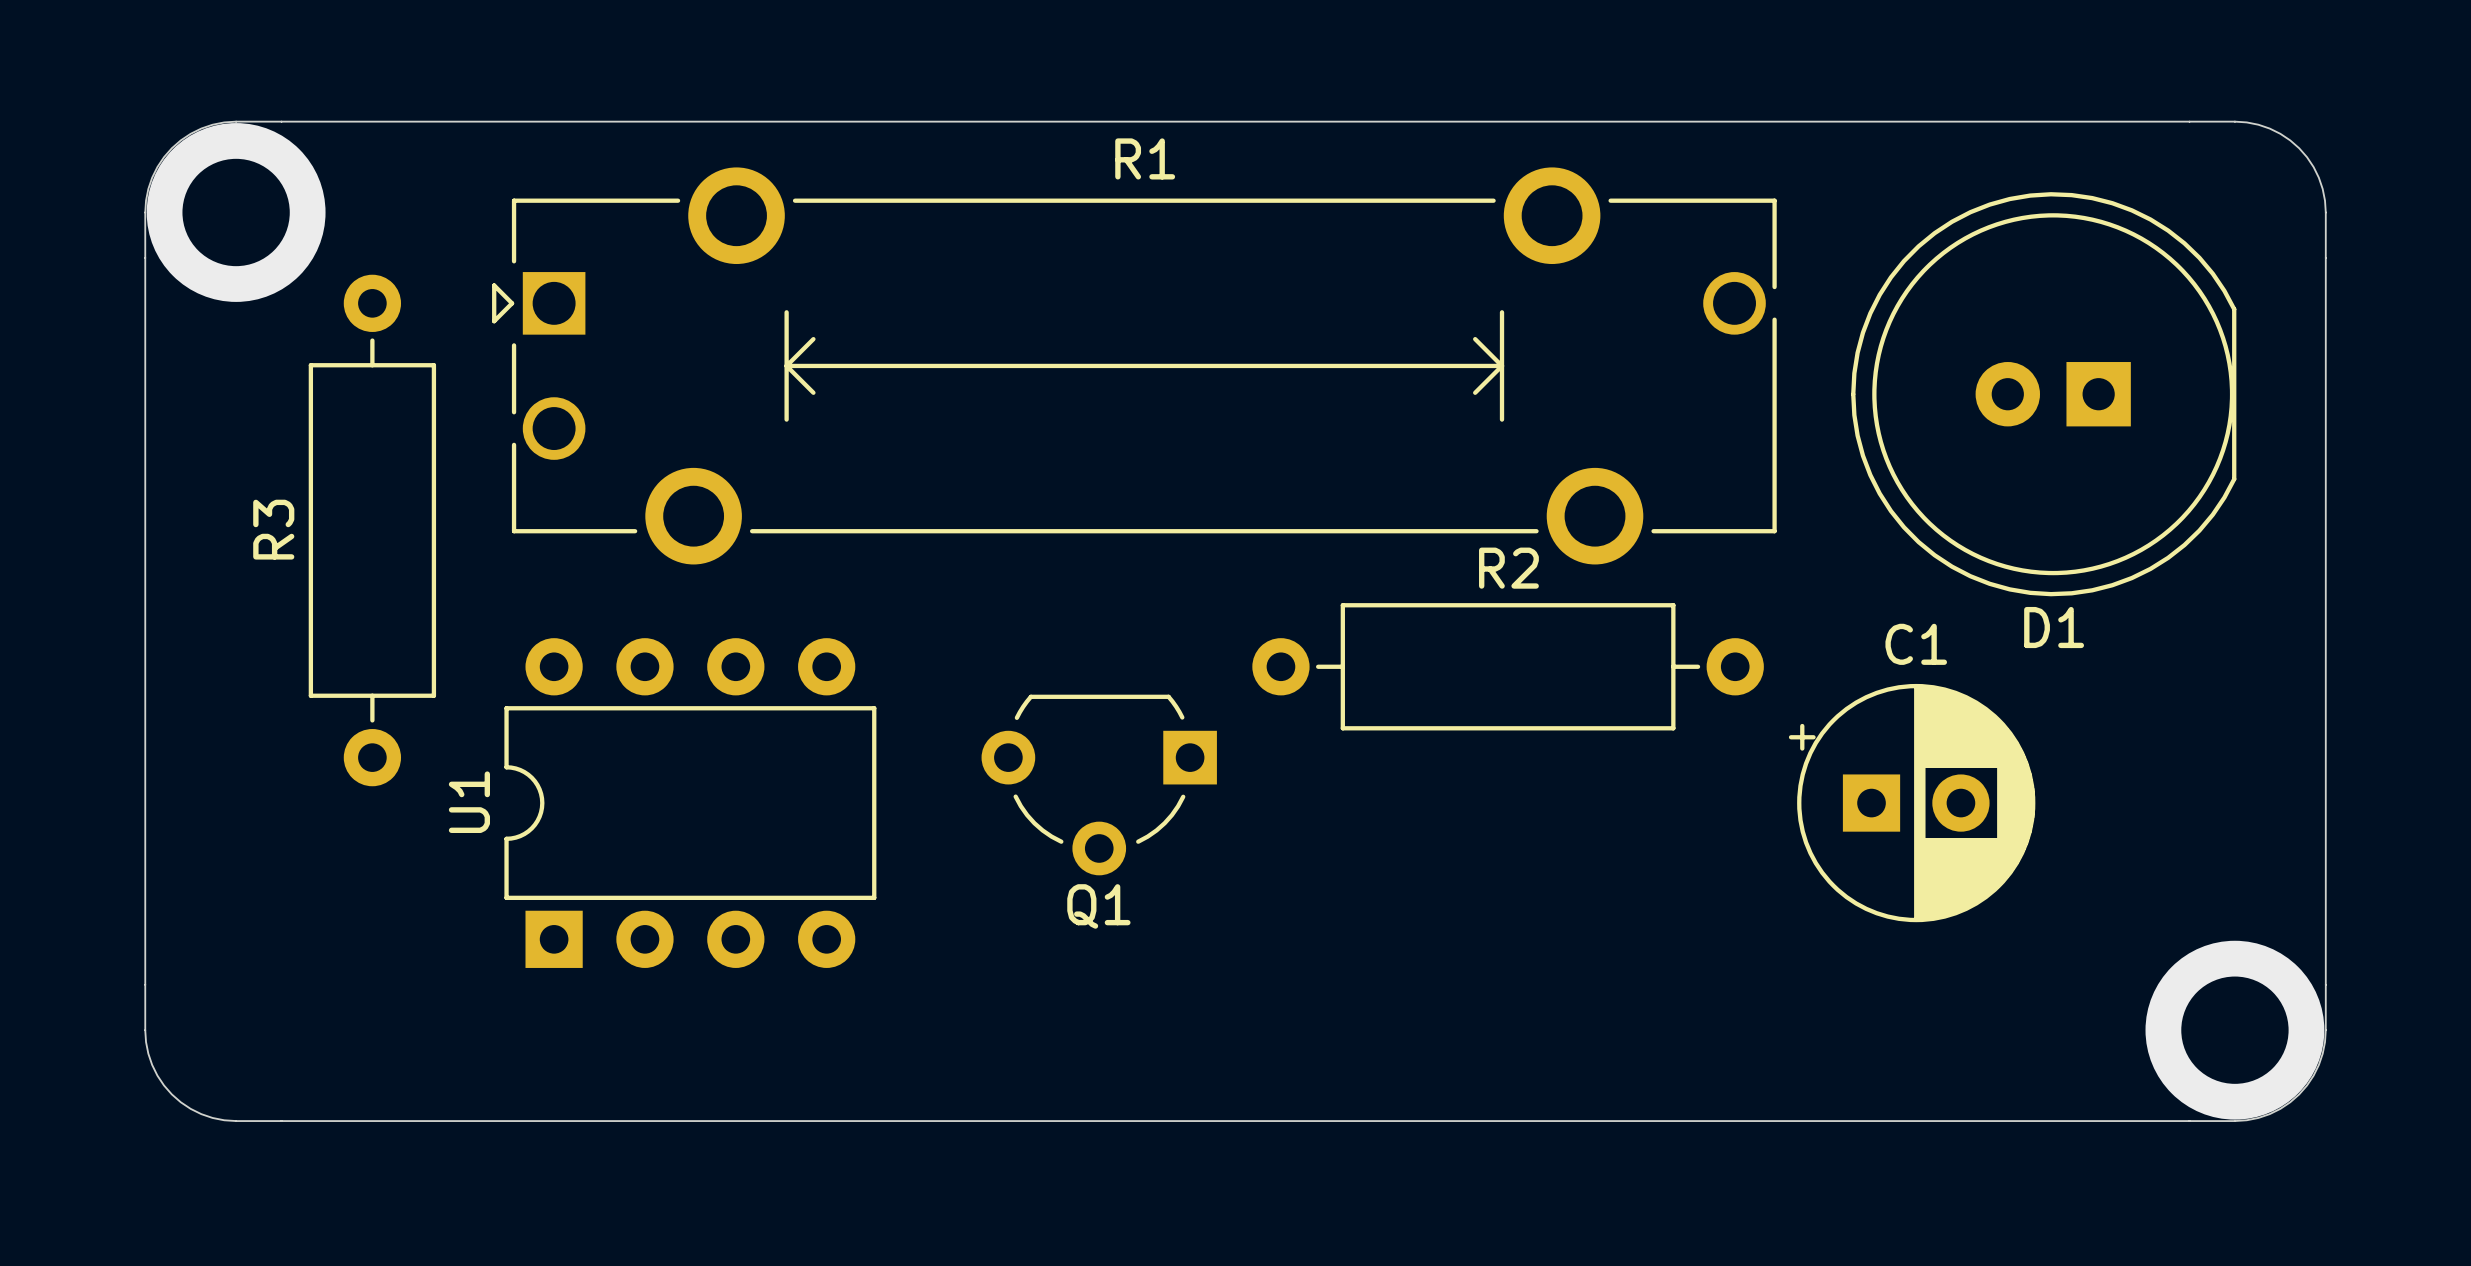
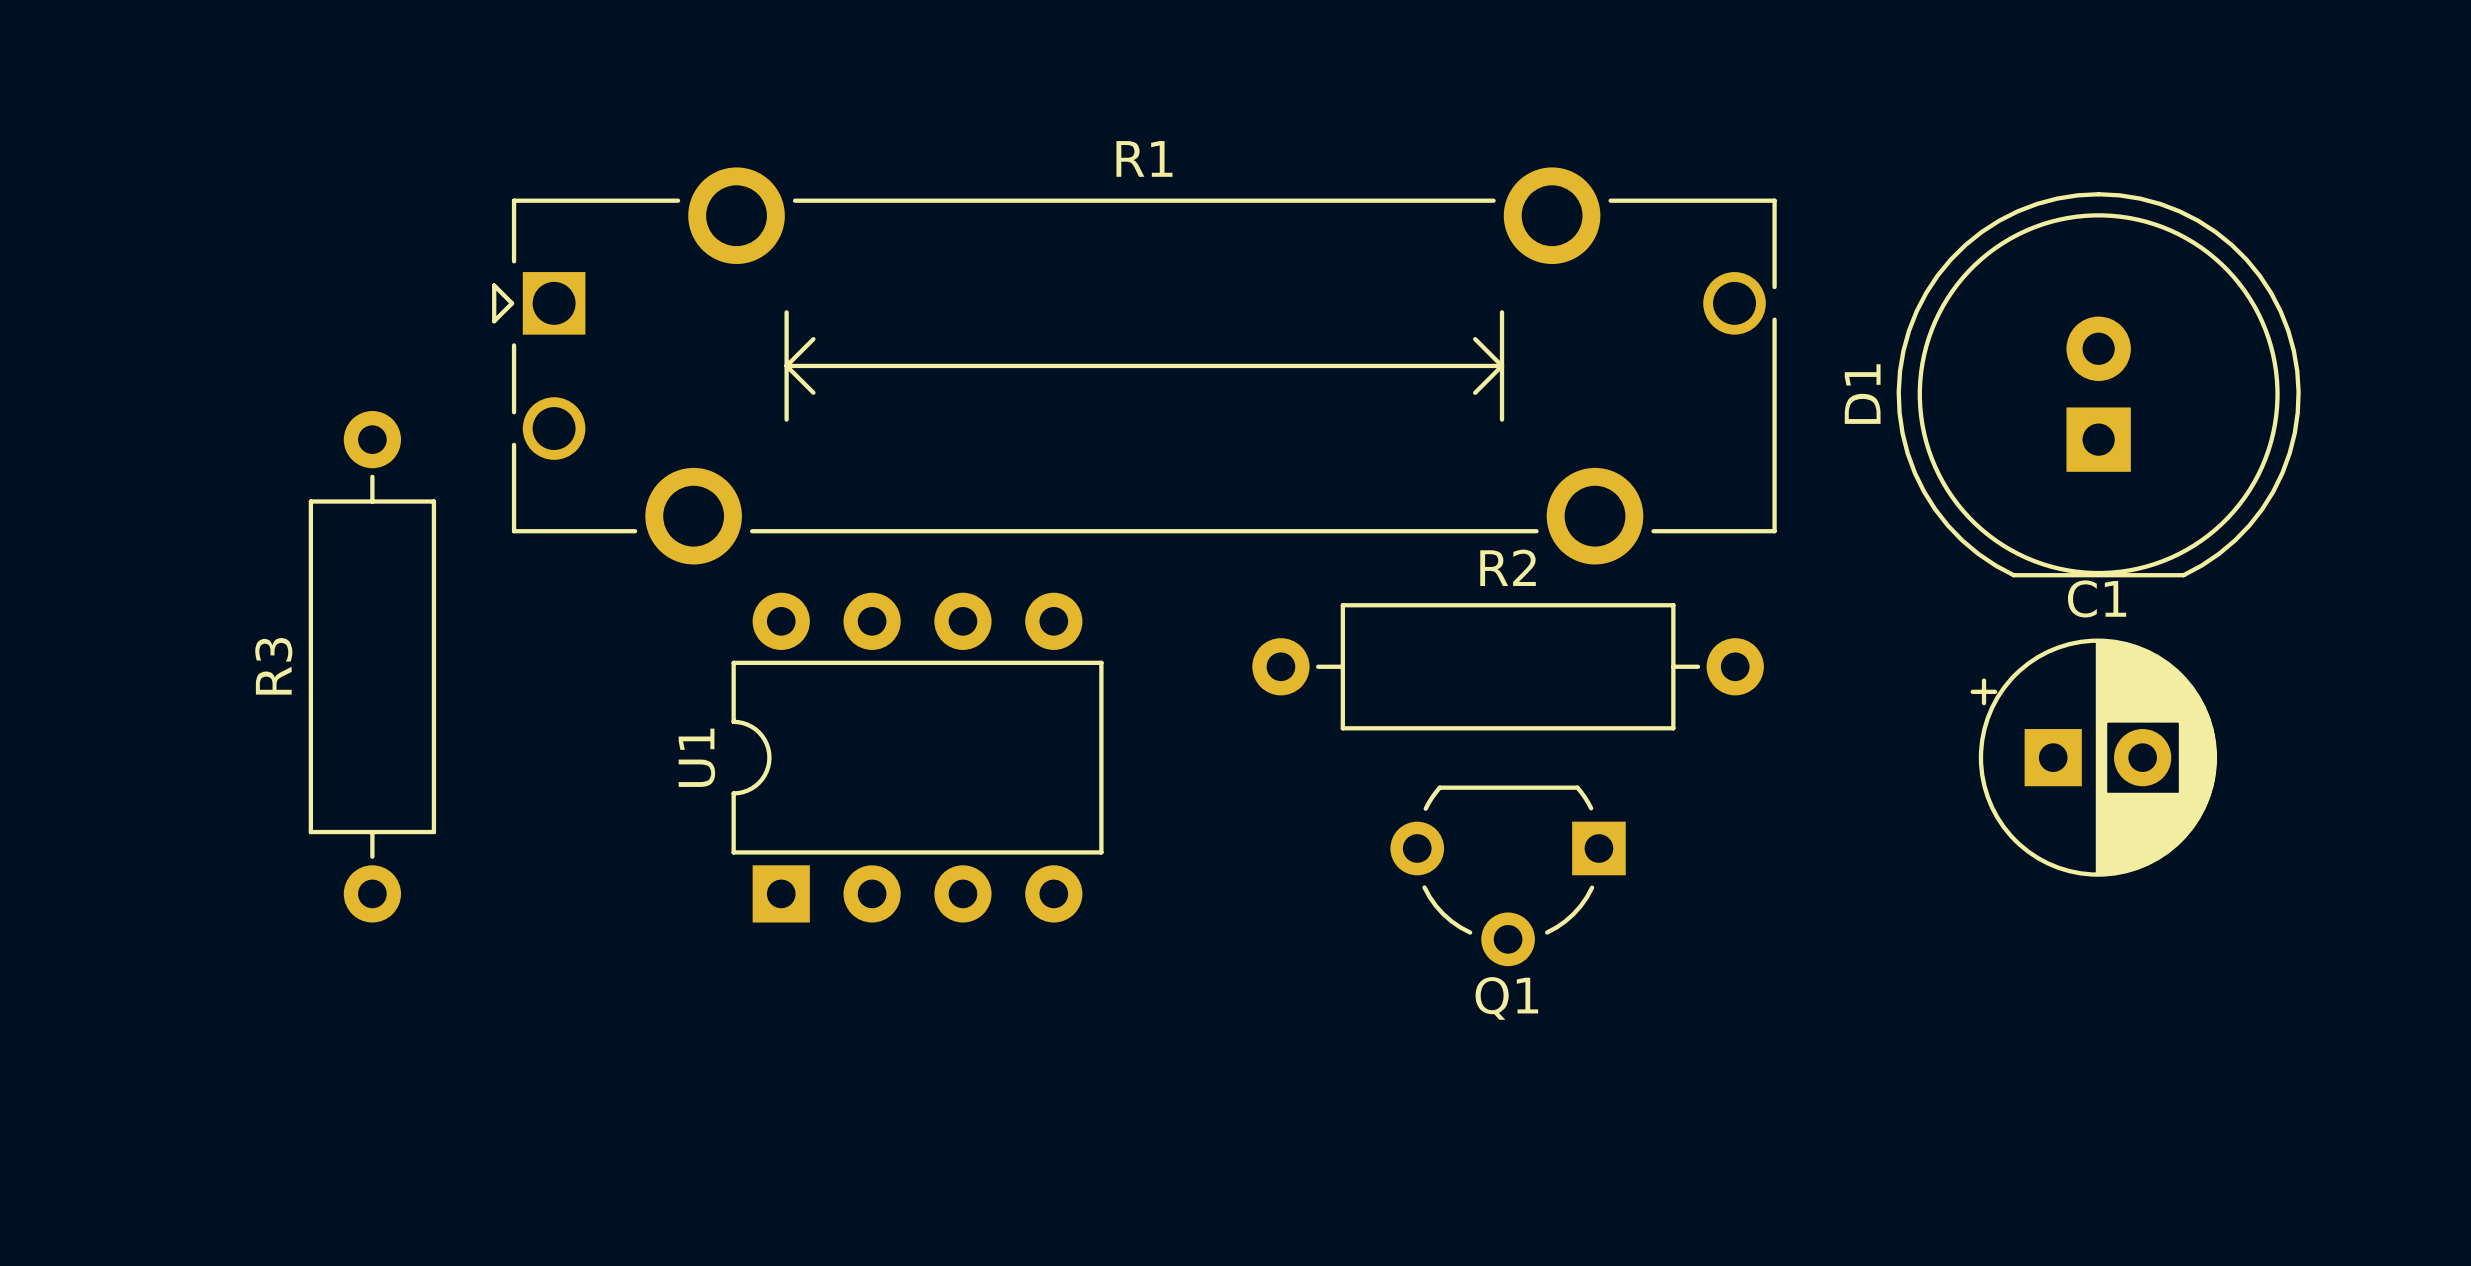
board edge: (236, 121) (2234, 121) (2258, 124) (2269, 128) (2290, 140) (2307, 157) (2313, 167) (2322, 188) (2325, 212) (2325, 1030) (2322, 1053) (2318, 1064) (2307, 1085) (2290, 1102) (2269, 1114) (2258, 1117) (2234, 1121) (236, 1121) (224, 1120) (201, 1114) (180, 1102) (164, 1085) (152, 1064) (146, 1042) (145, 1030) (145, 212) (146, 200) (152, 177) (157, 167) (171, 148) (190, 133) (201, 128) (212, 124) (236, 121) -> none
via: (236, 212) -> none
D1 rotation: 0° (2043, 394) -> 90° clockwise (2098, 384)
R3 position: (372, 530) -> (372, 666)
Q1 position: (1099, 784) -> (1508, 875)
U1 position: (690, 803) -> (917, 757)
C1 position: (1912, 803) -> (2093, 757)
via: (2234, 1030) -> none

